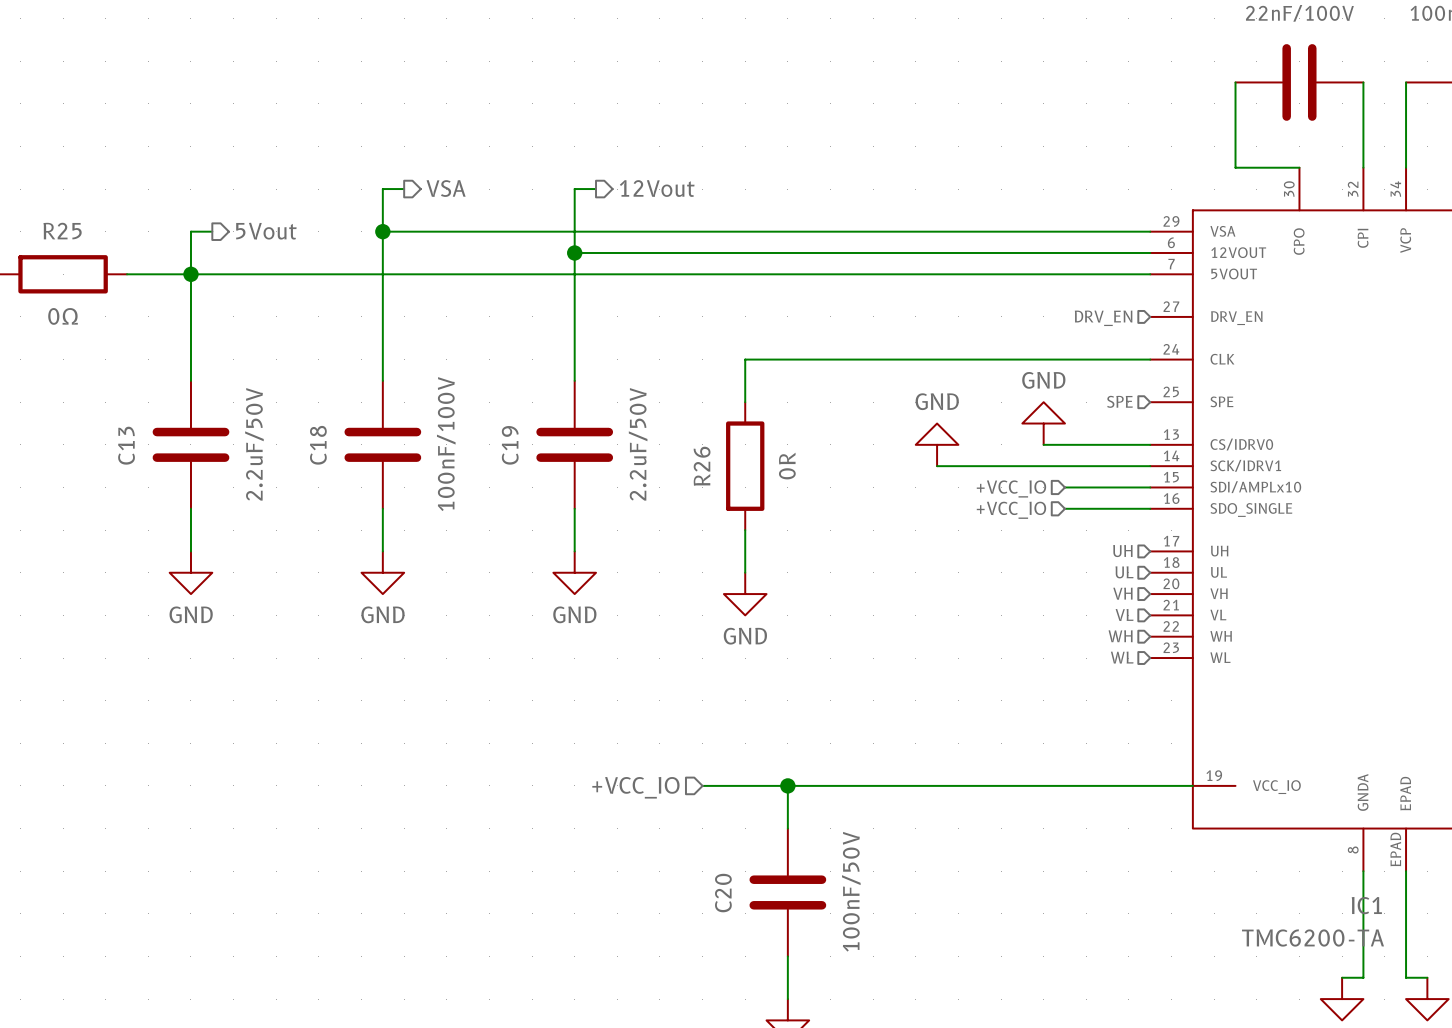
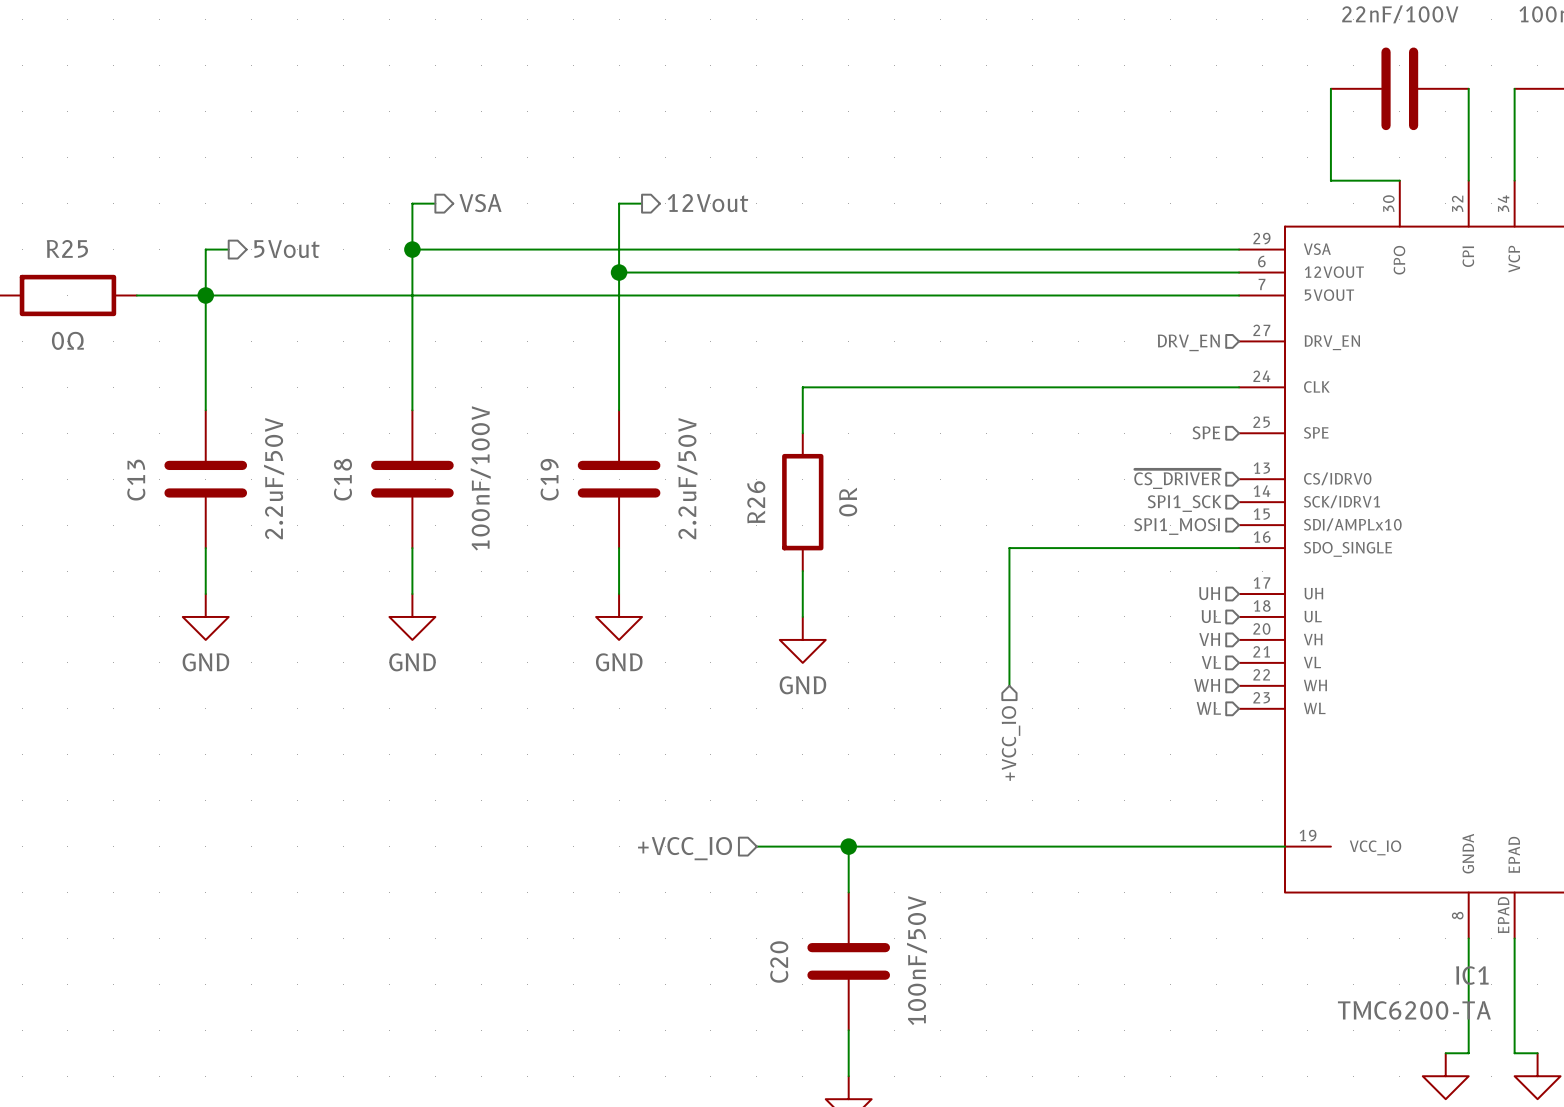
power symbol: GND (1043, 423) -> none
power symbol: GND (937, 444) -> none
wire: (1043, 444) (1150, 444) -> none
hierarchical label: none -> ~{CS_DRIVER} (1177, 479)
wire: (937, 466) (1150, 466) -> none
hierarchical label: none -> SPI1_SCK (1184, 503)
wire: (1064, 487) (1150, 487) -> none
hierarchical label: +VCC_IO (1011, 488) -> none
hierarchical label: none -> SPI1_MOSI (1177, 526)
wire: none -> (1147, 548) (1009, 548) (1009, 685)
hierarchical label: +VCC_IO (1011, 510) -> none
hierarchical label: none -> +VCC_IO (1011, 743)

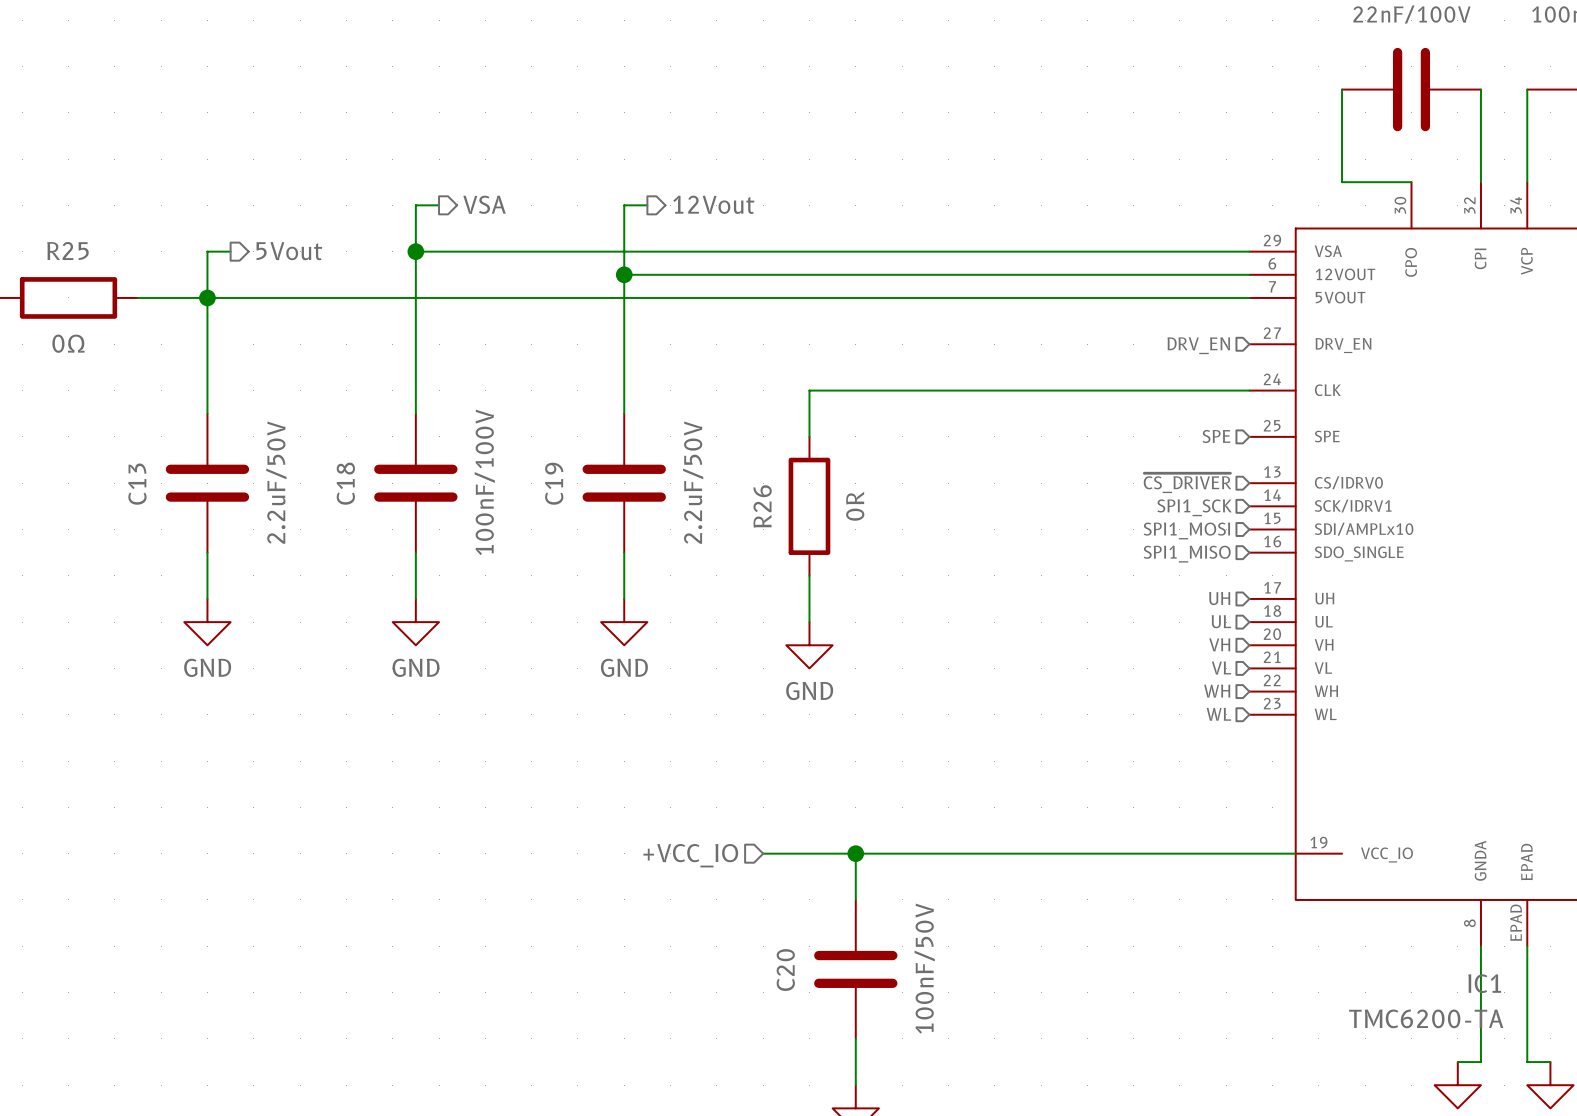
wire: (1239, 548) (1009, 548) (1009, 685) -> none
hierarchical label: none -> SPI1_MISO (1187, 554)
hierarchical label: +VCC_IO (1011, 743) -> none

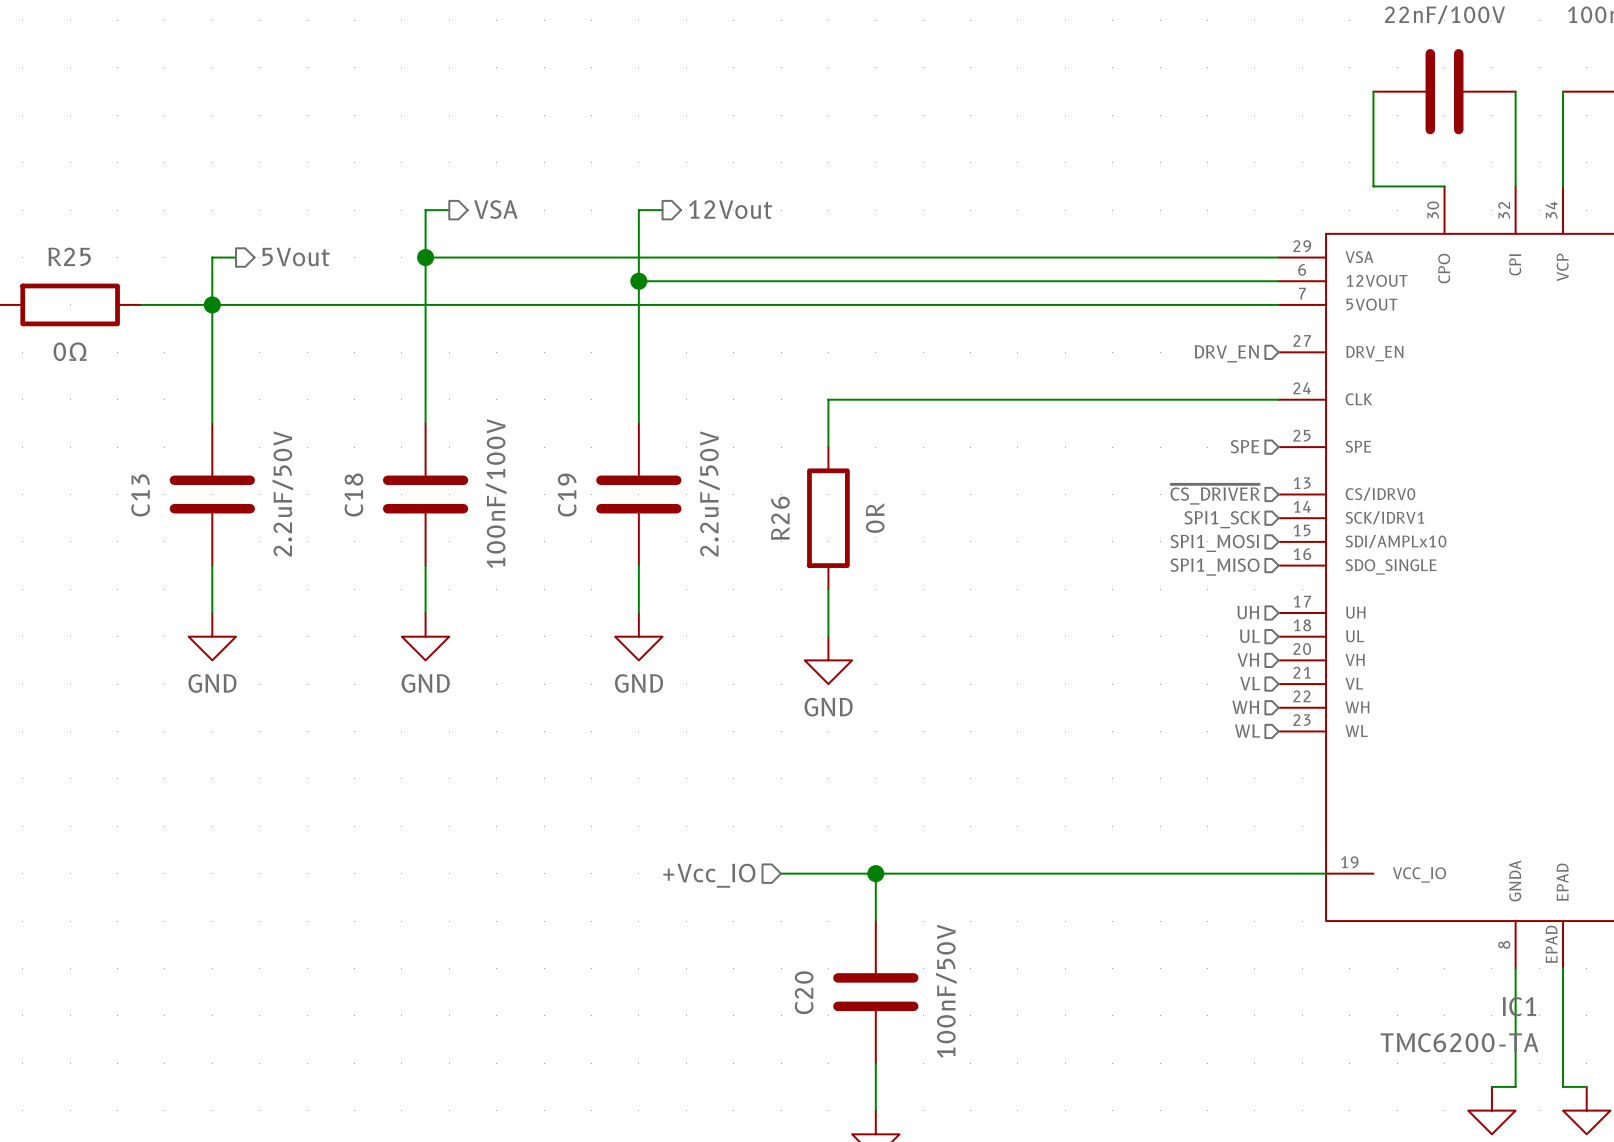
hierarchical label: +VCC_IO (690, 855) -> +Vcc_IO (709, 875)

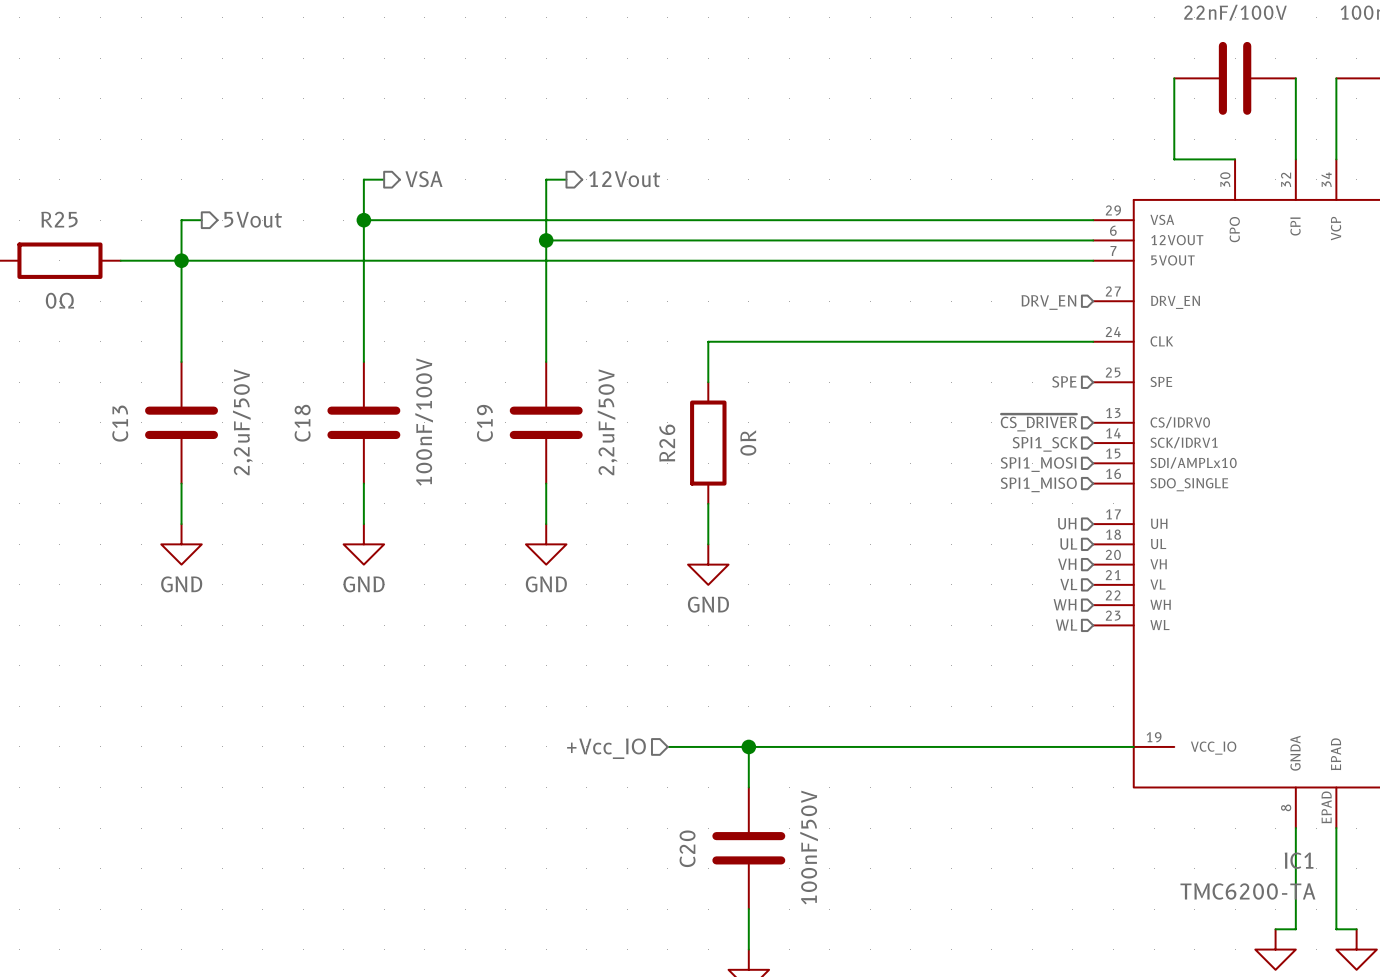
C13 value: 2.2uF/50V (282, 493) -> 2,2uF/50V (242, 422)
C19 value: 2.2uF/50V (709, 493) -> 2,2uF/50V (607, 422)

